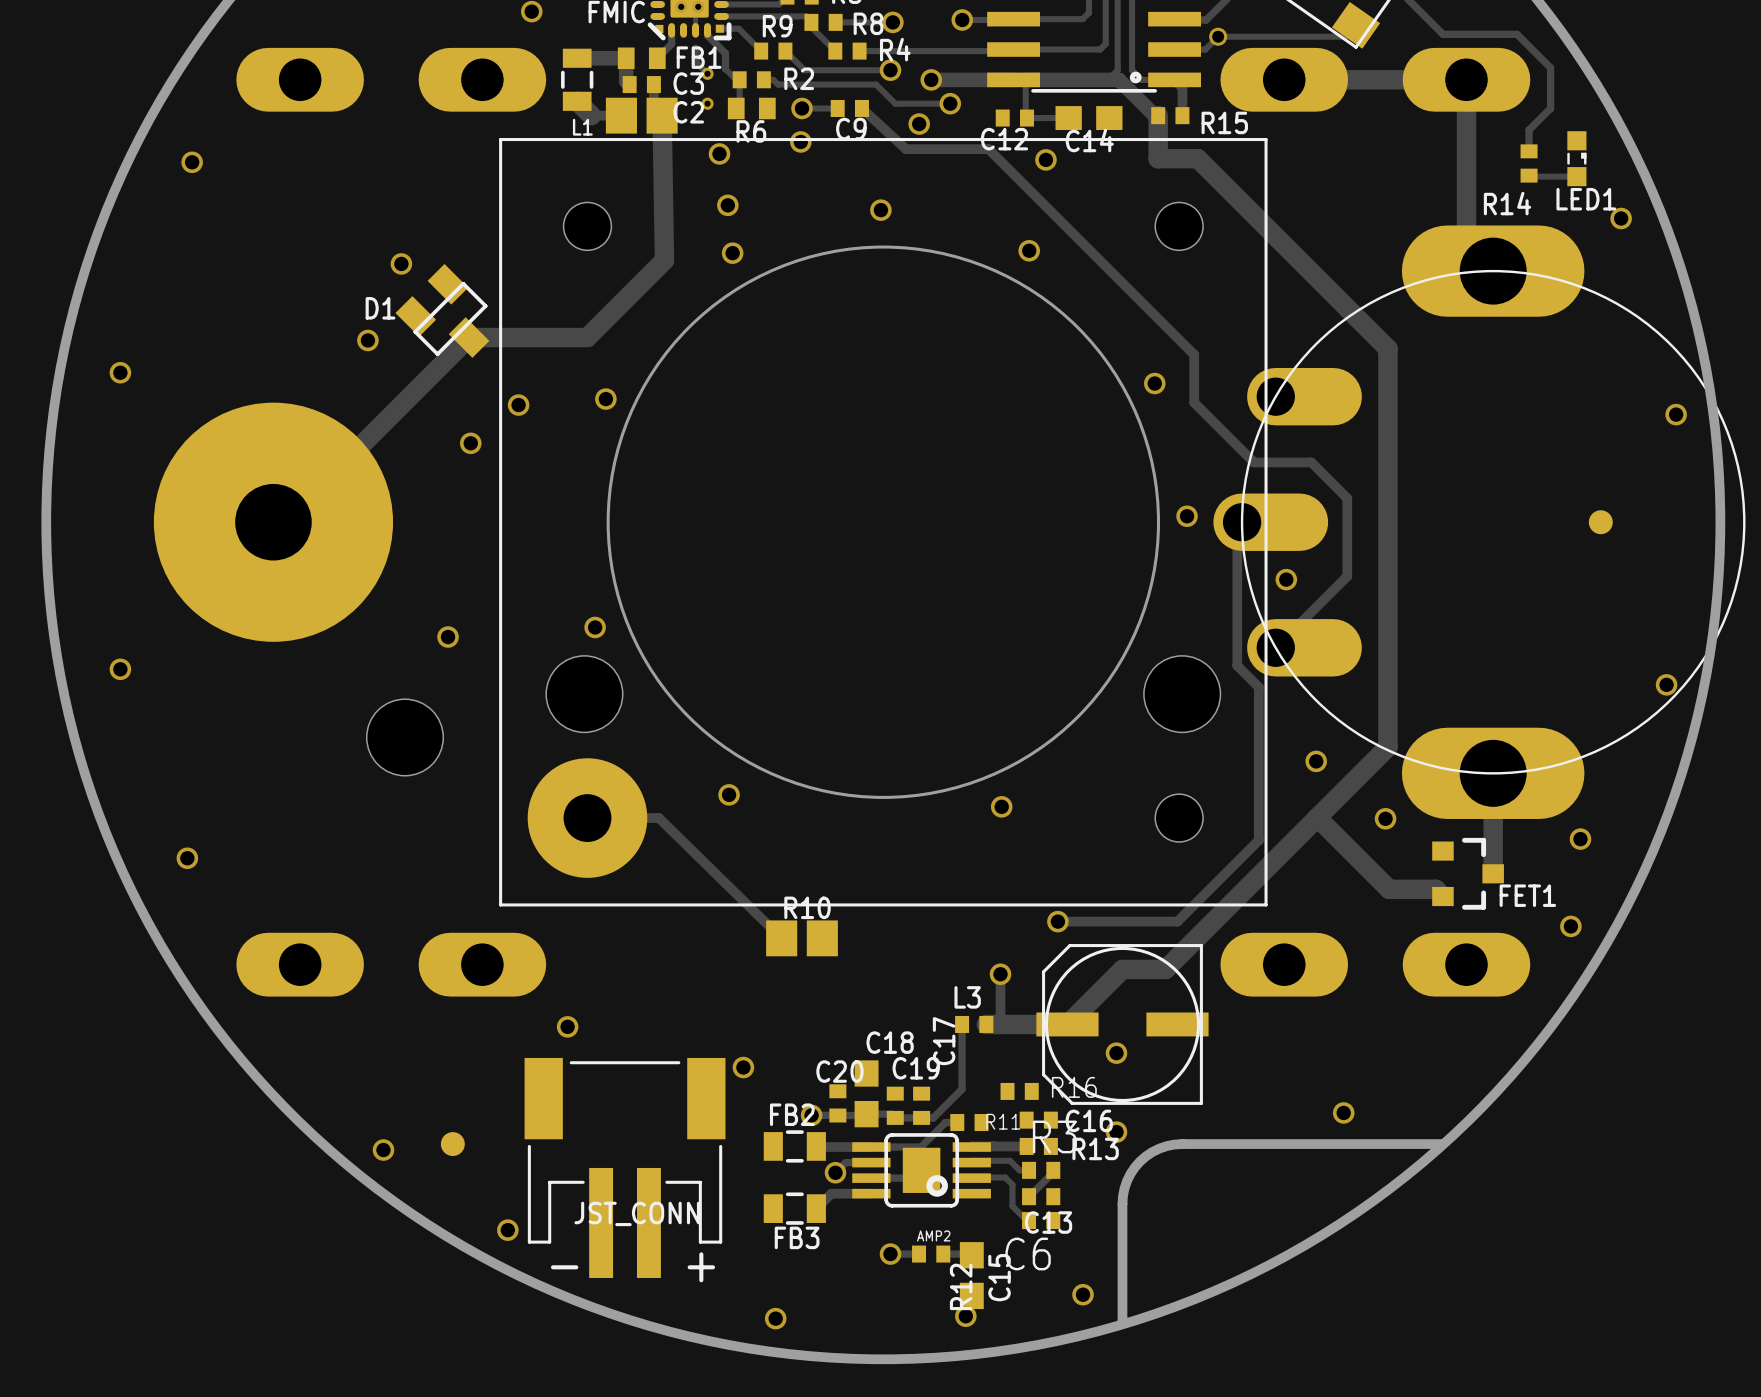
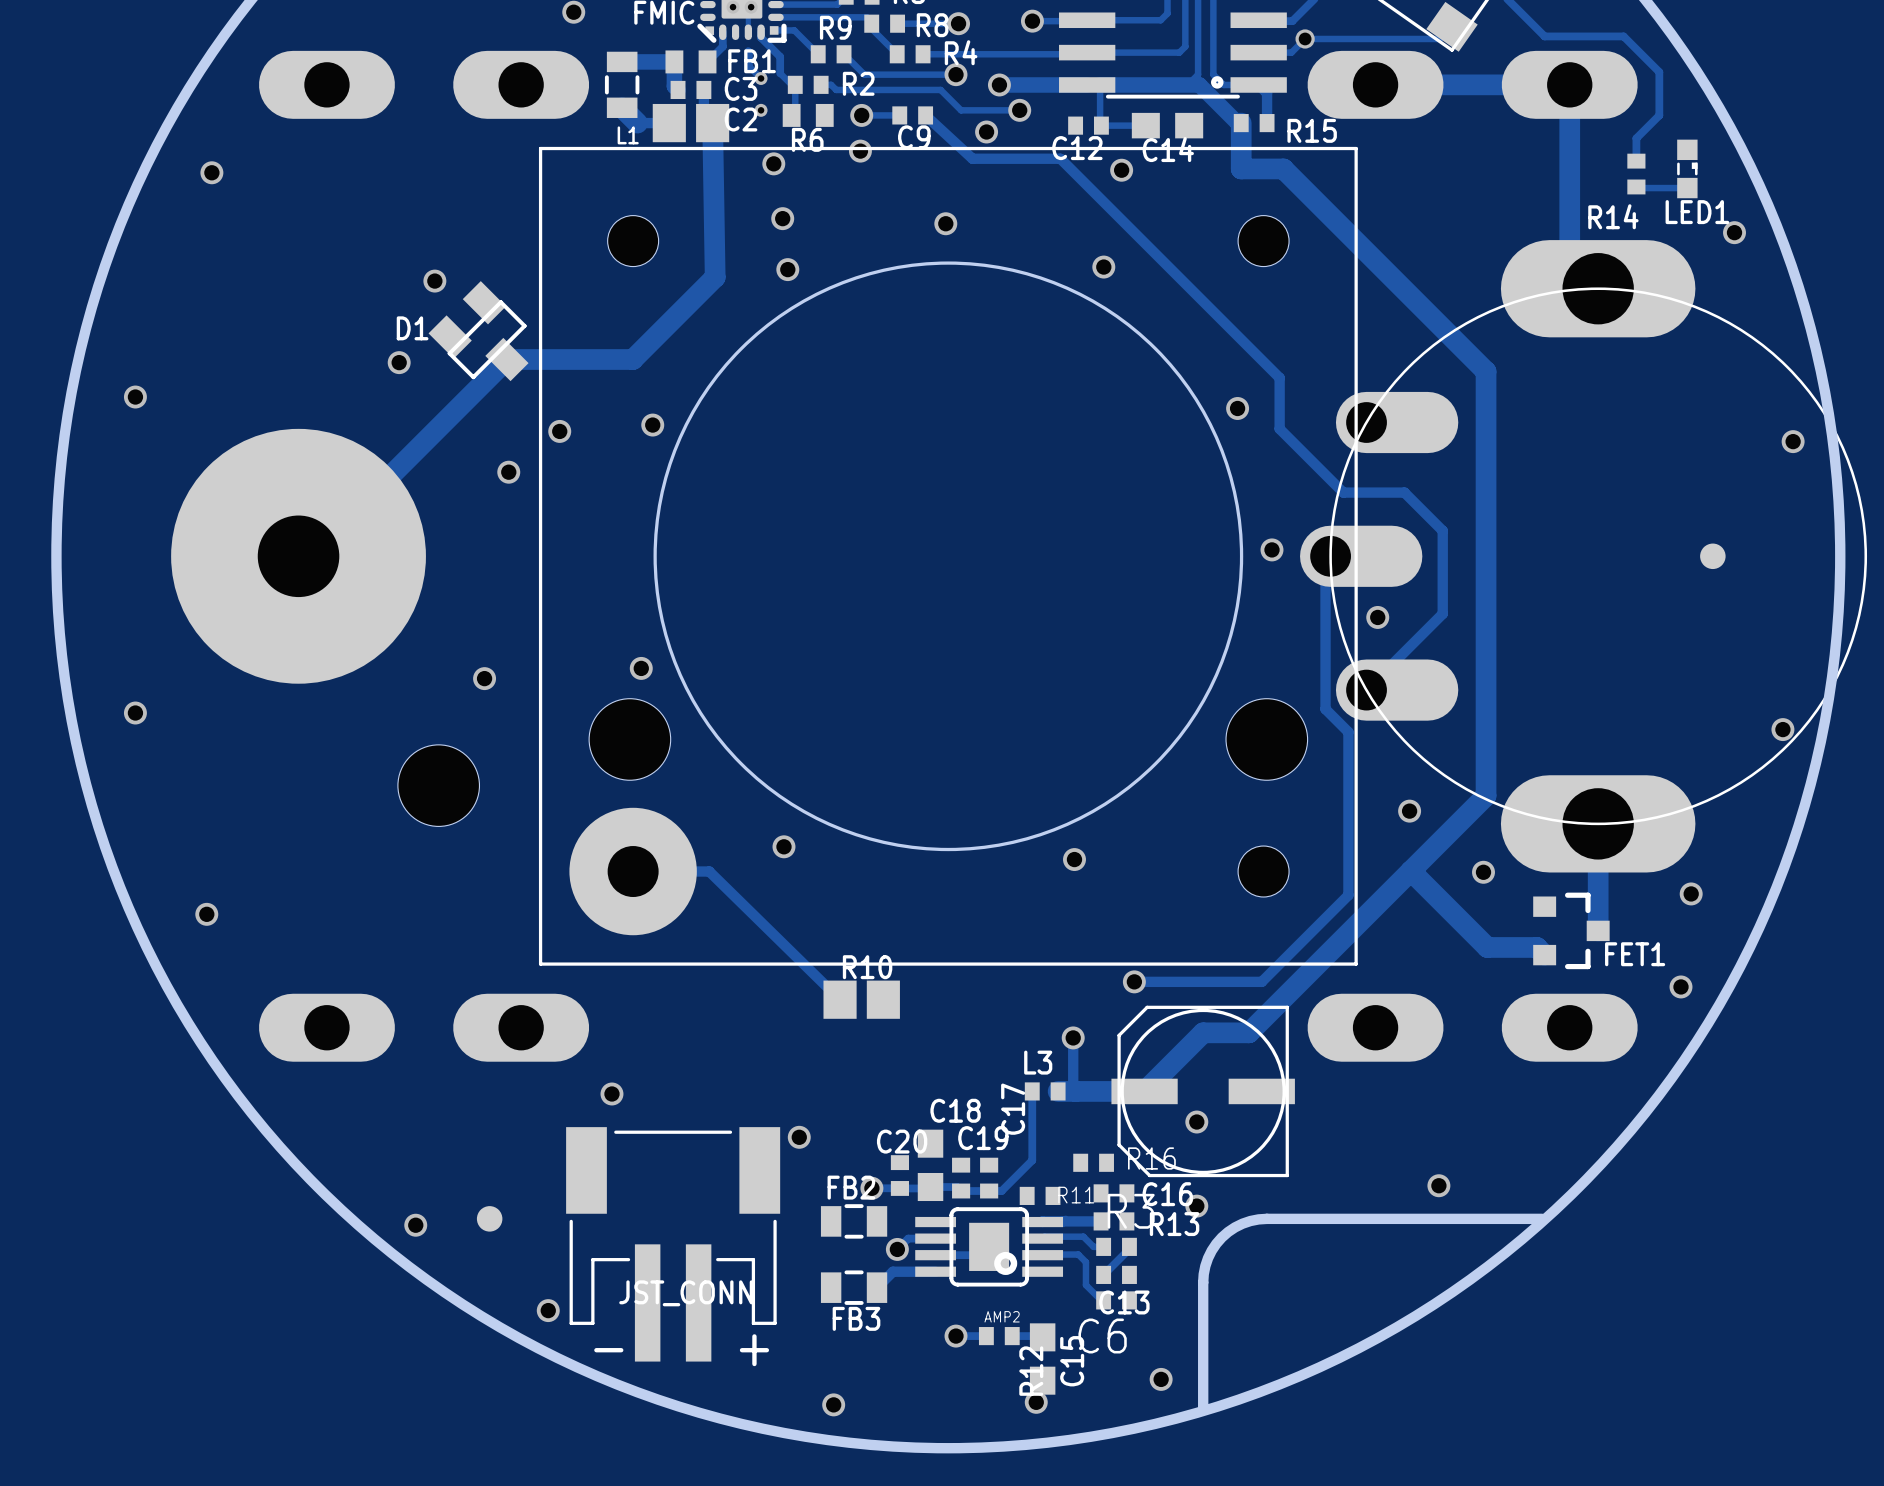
track: (957, 1122) (945, 1122) (920, 1147) (816, 1146) -> none

